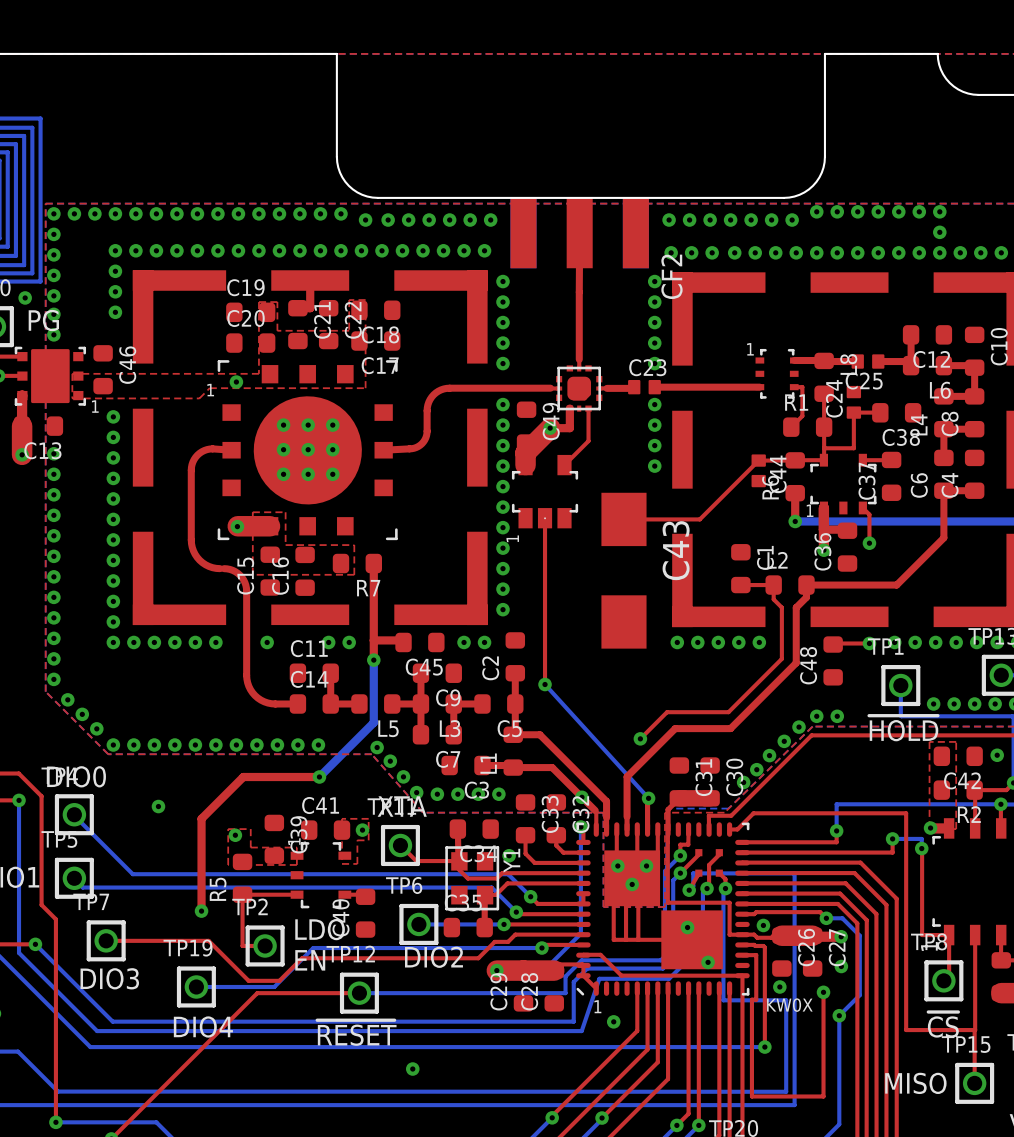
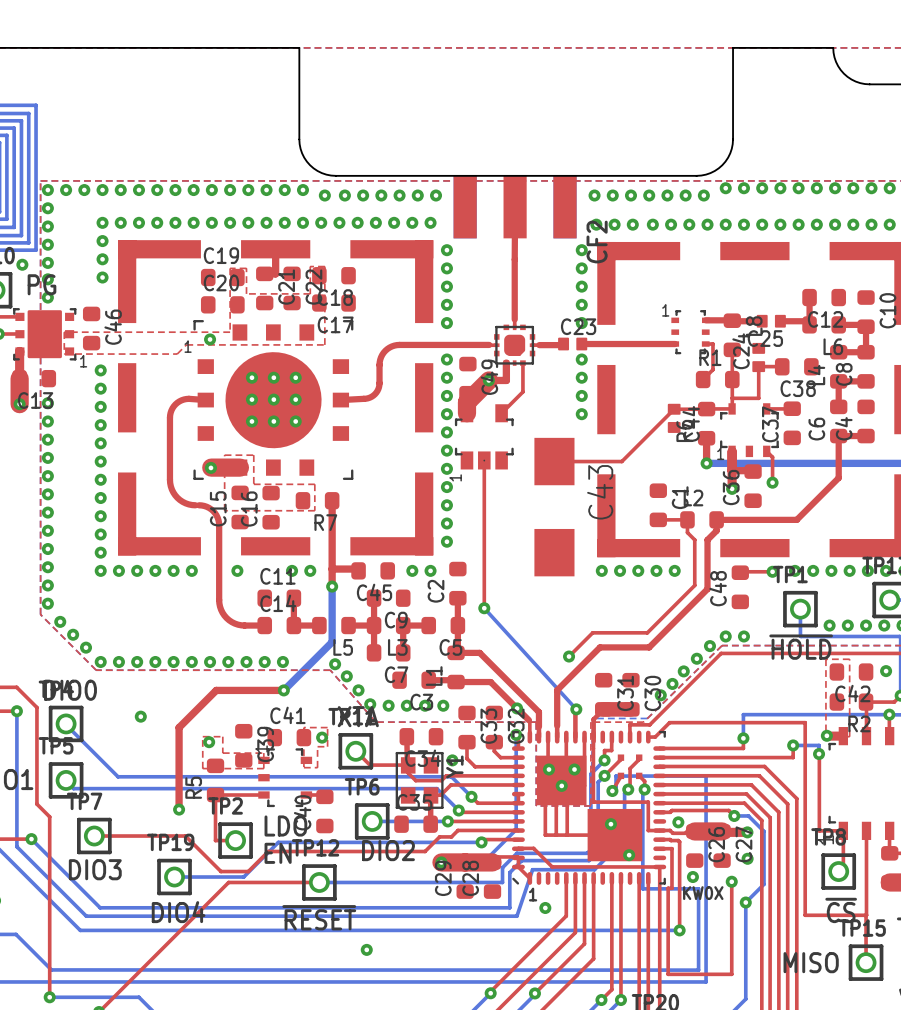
via: none -> (853, 188)
via: none -> (871, 188)
via: none -> (889, 188)
via: (939, 232) -> none

